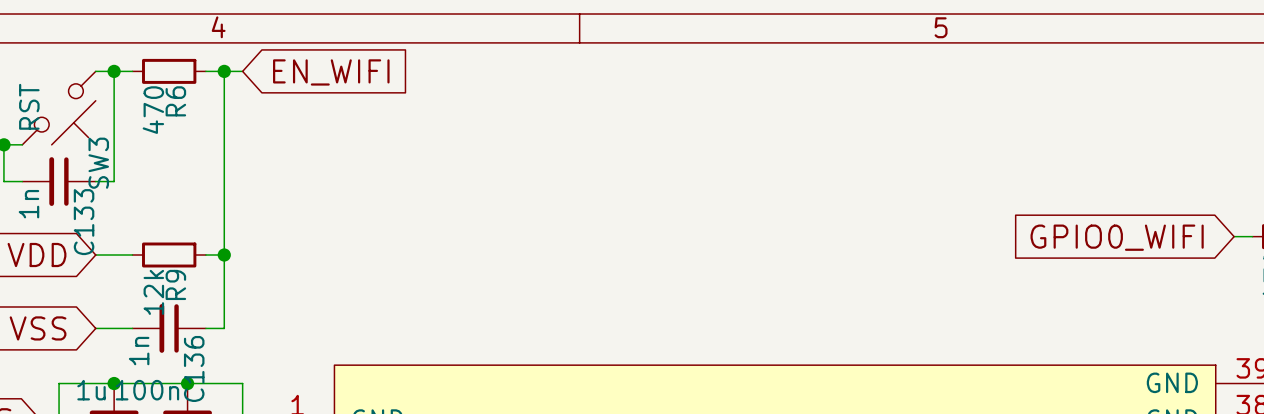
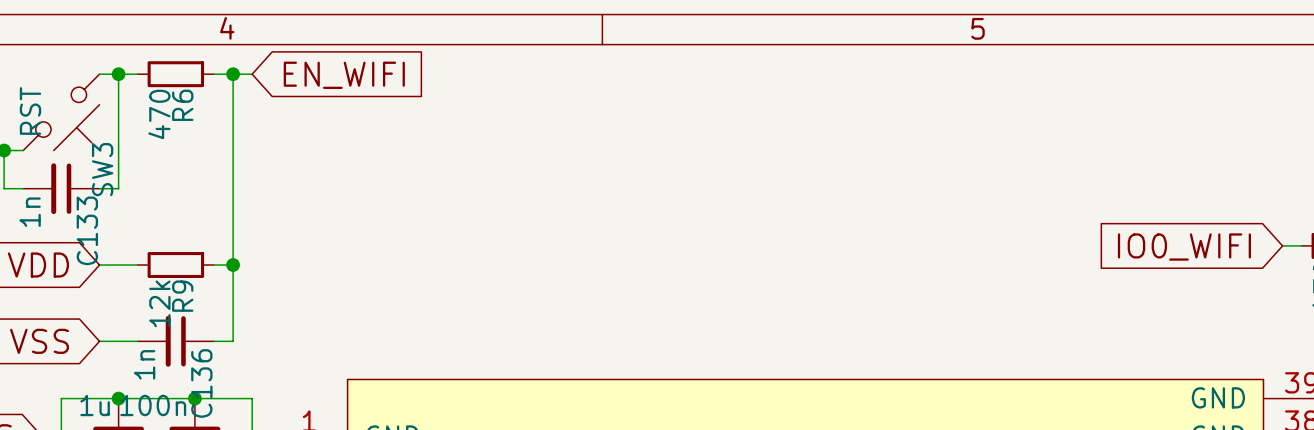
global label: GPIO0_WIFI (1117, 237) -> IO0_WIFI (1184, 247)

